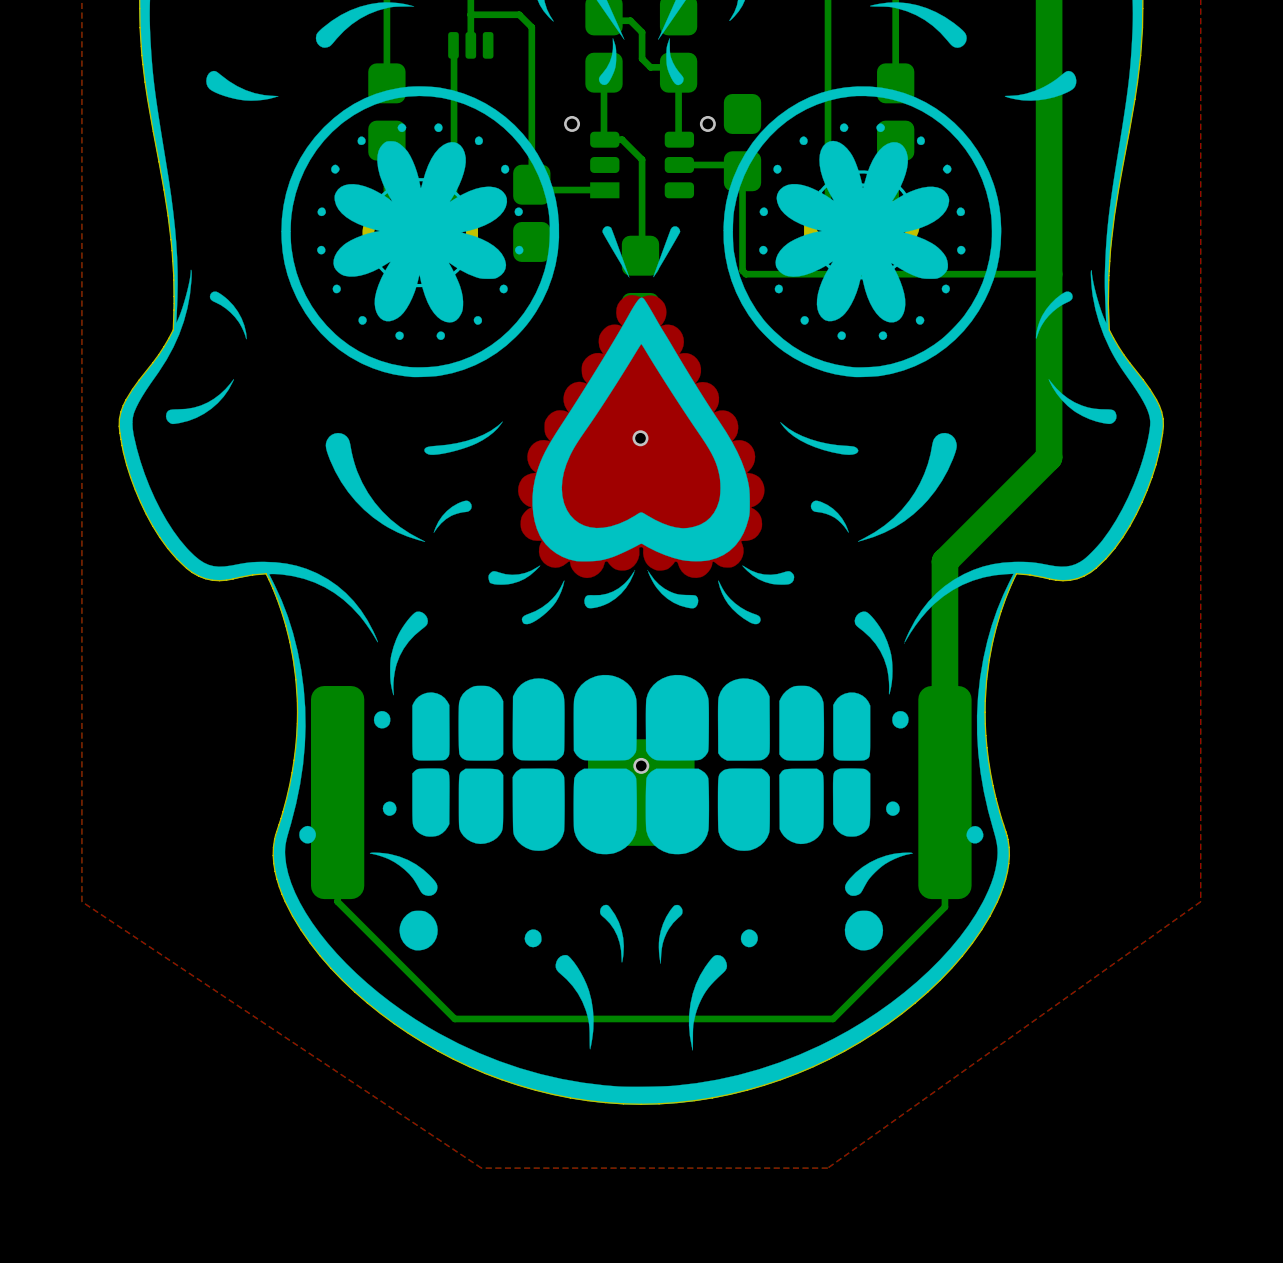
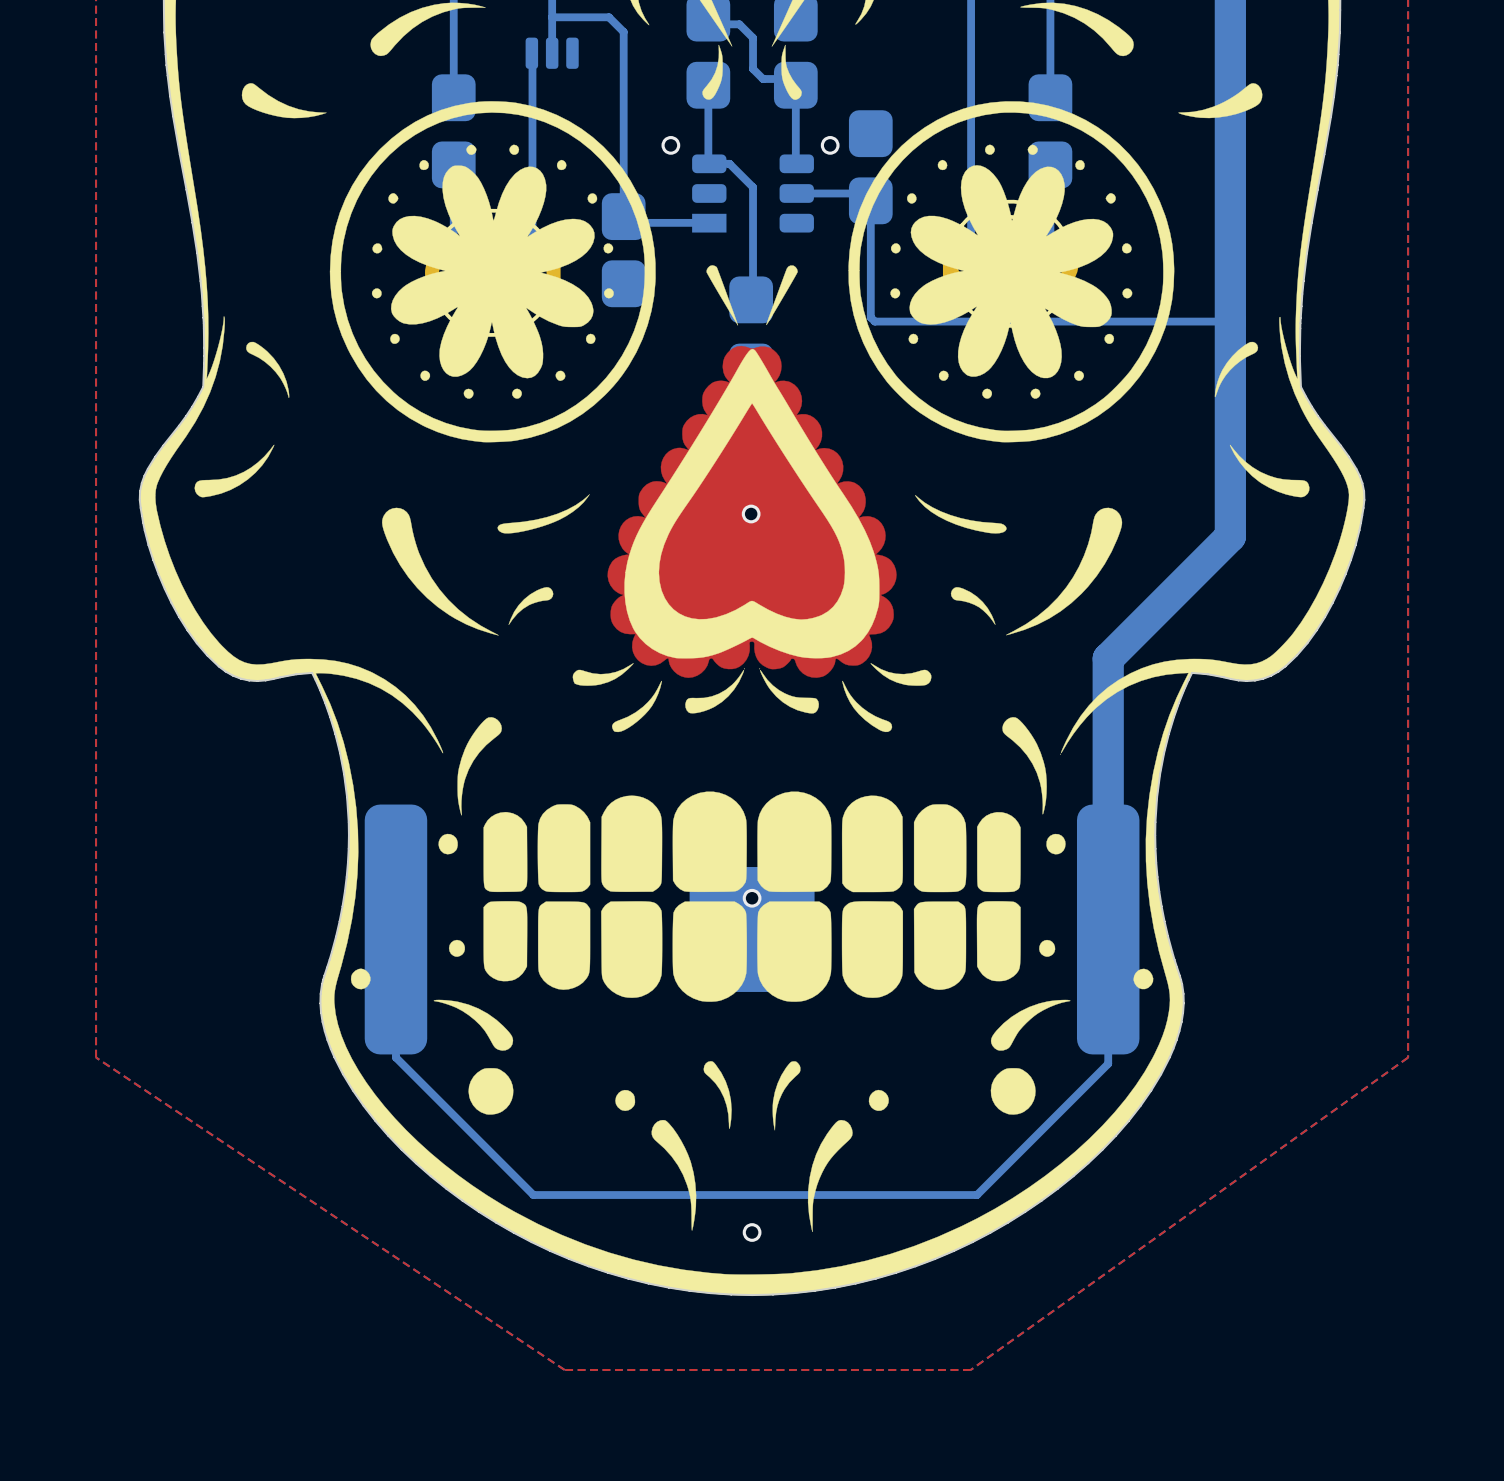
via: none -> (752, 1232)

